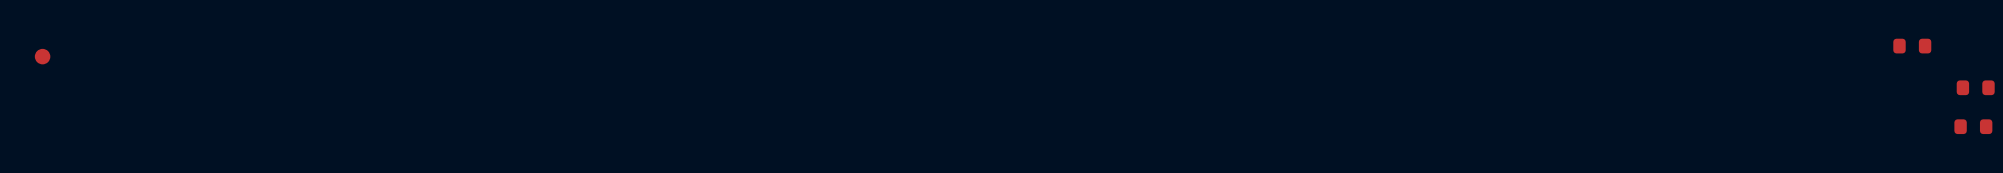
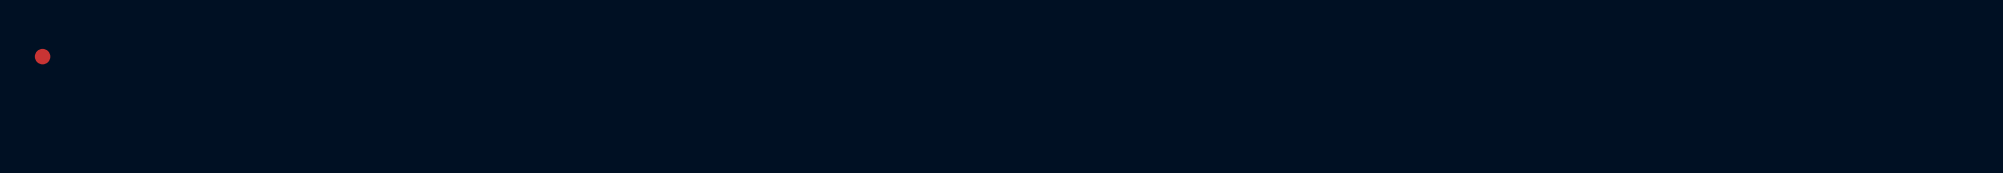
part: (1912, 46) -> none
part: (1975, 87) -> none
part: (1973, 126) -> none

